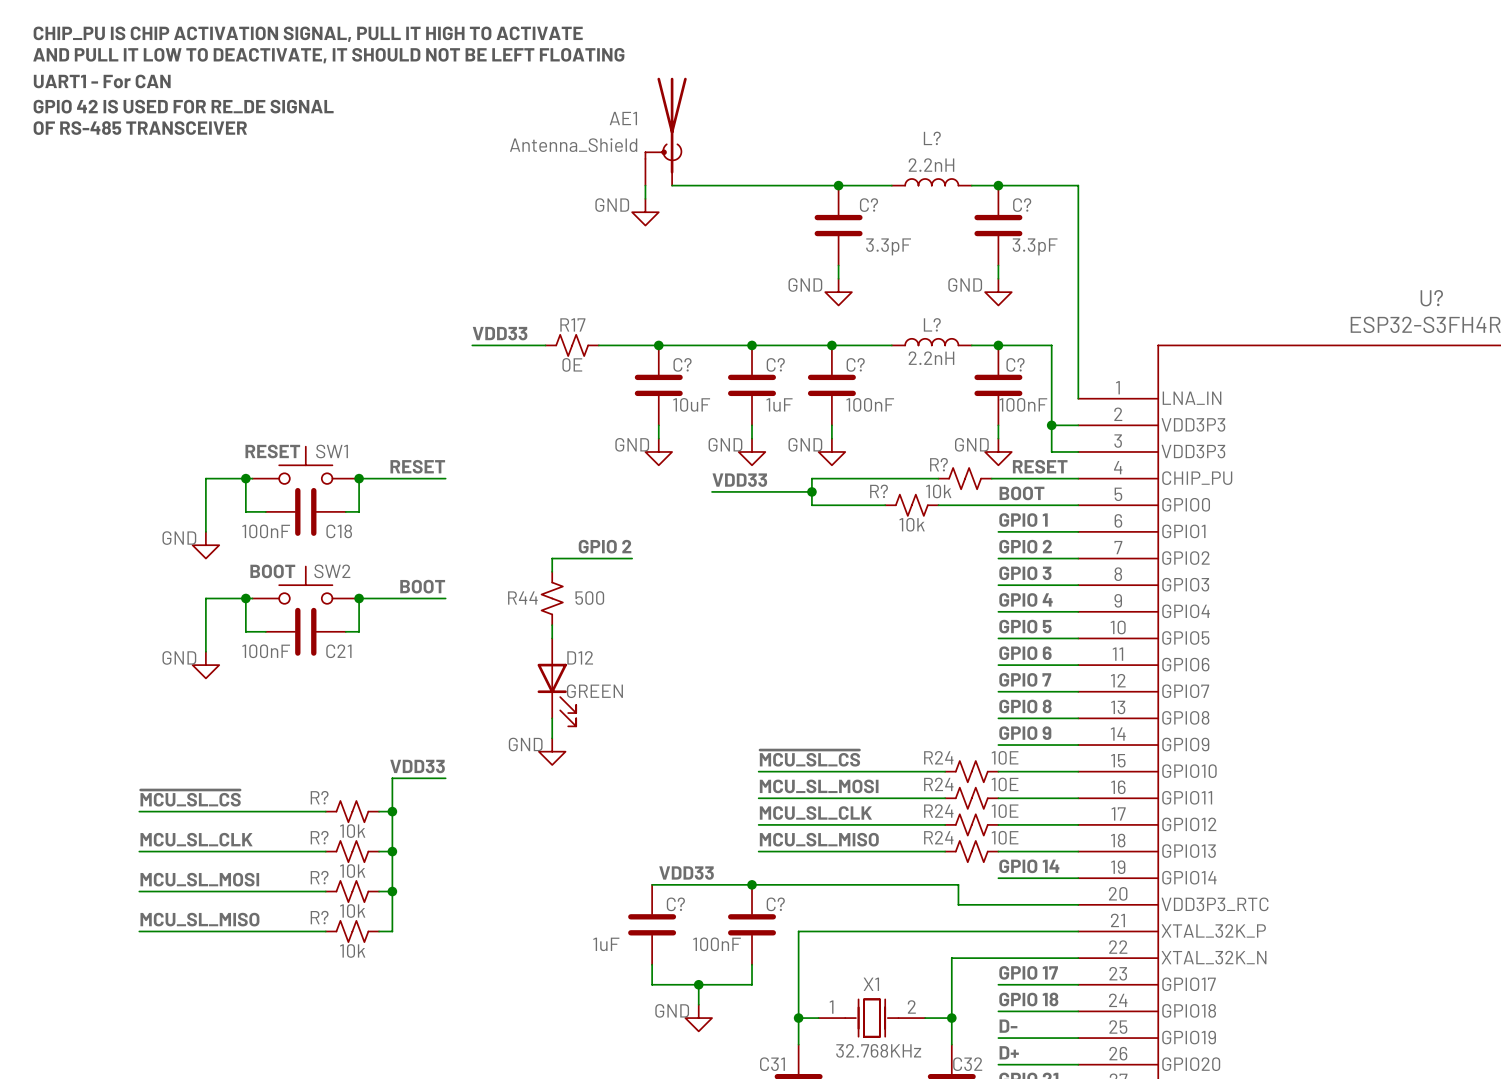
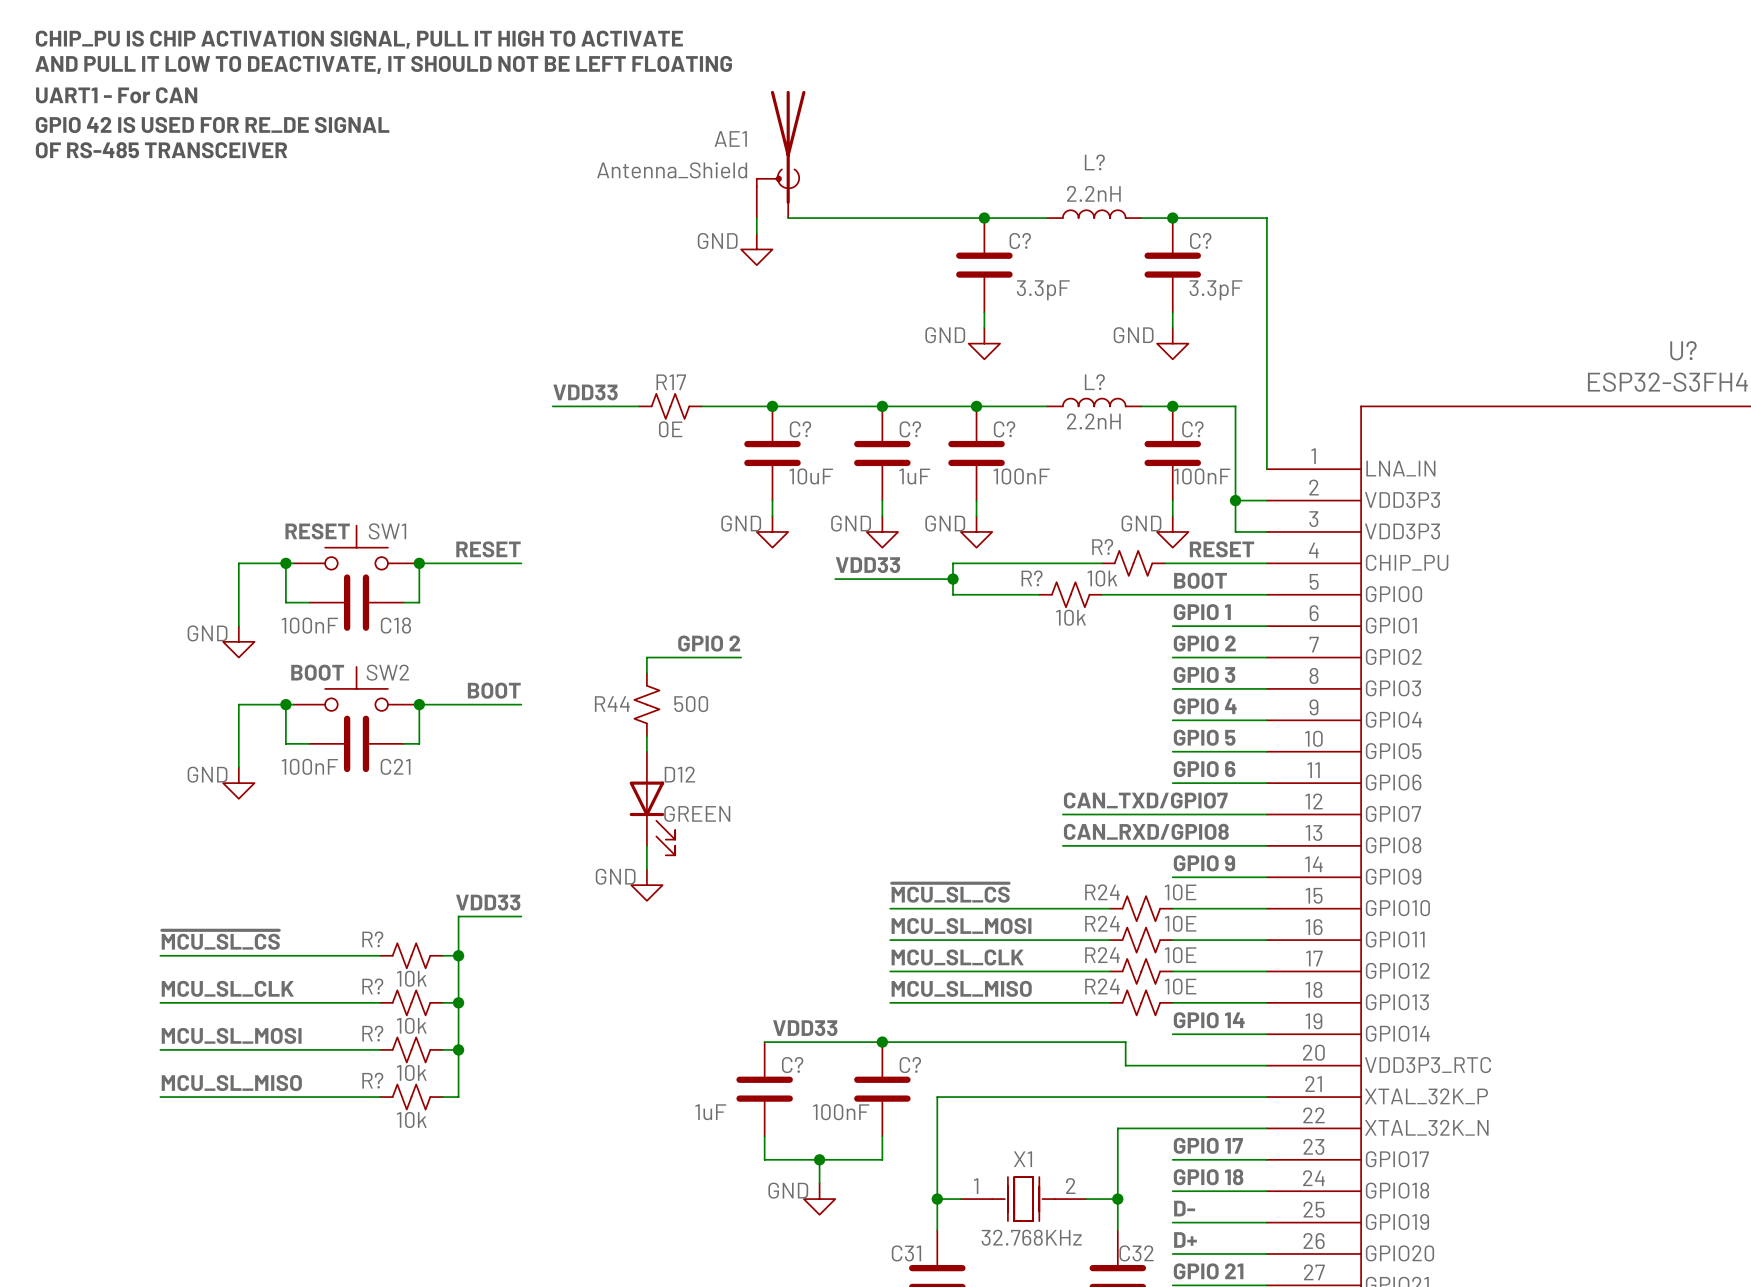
label: none -> CAN_TXD/GPIO7 (1145, 800)
label: GPIO 7 (1025, 679) -> none
wire: none -> (1062, 814) (1172, 814)
label: none -> CAN_RXD/GPIO8 (1146, 831)
label: GPIO 8 (1025, 706) -> none
wire: none -> (1062, 845) (1172, 845)

